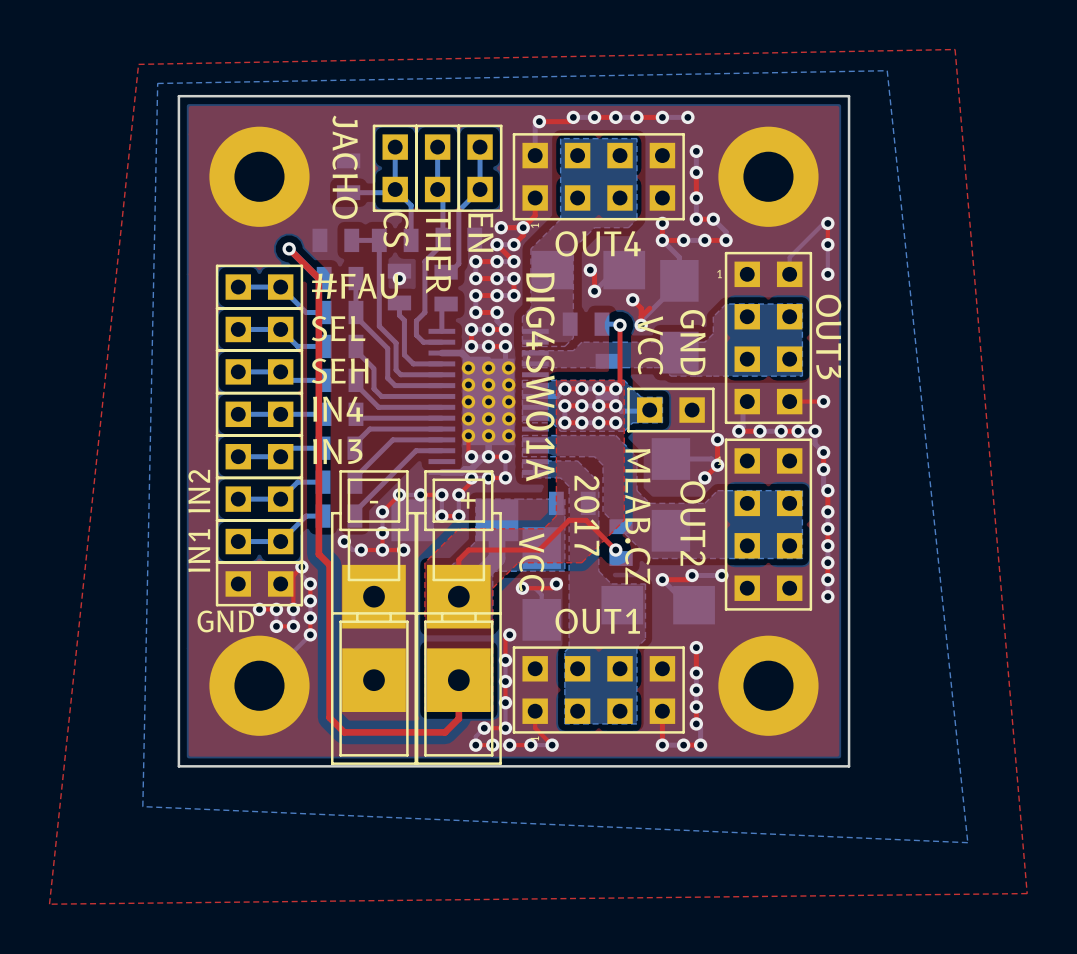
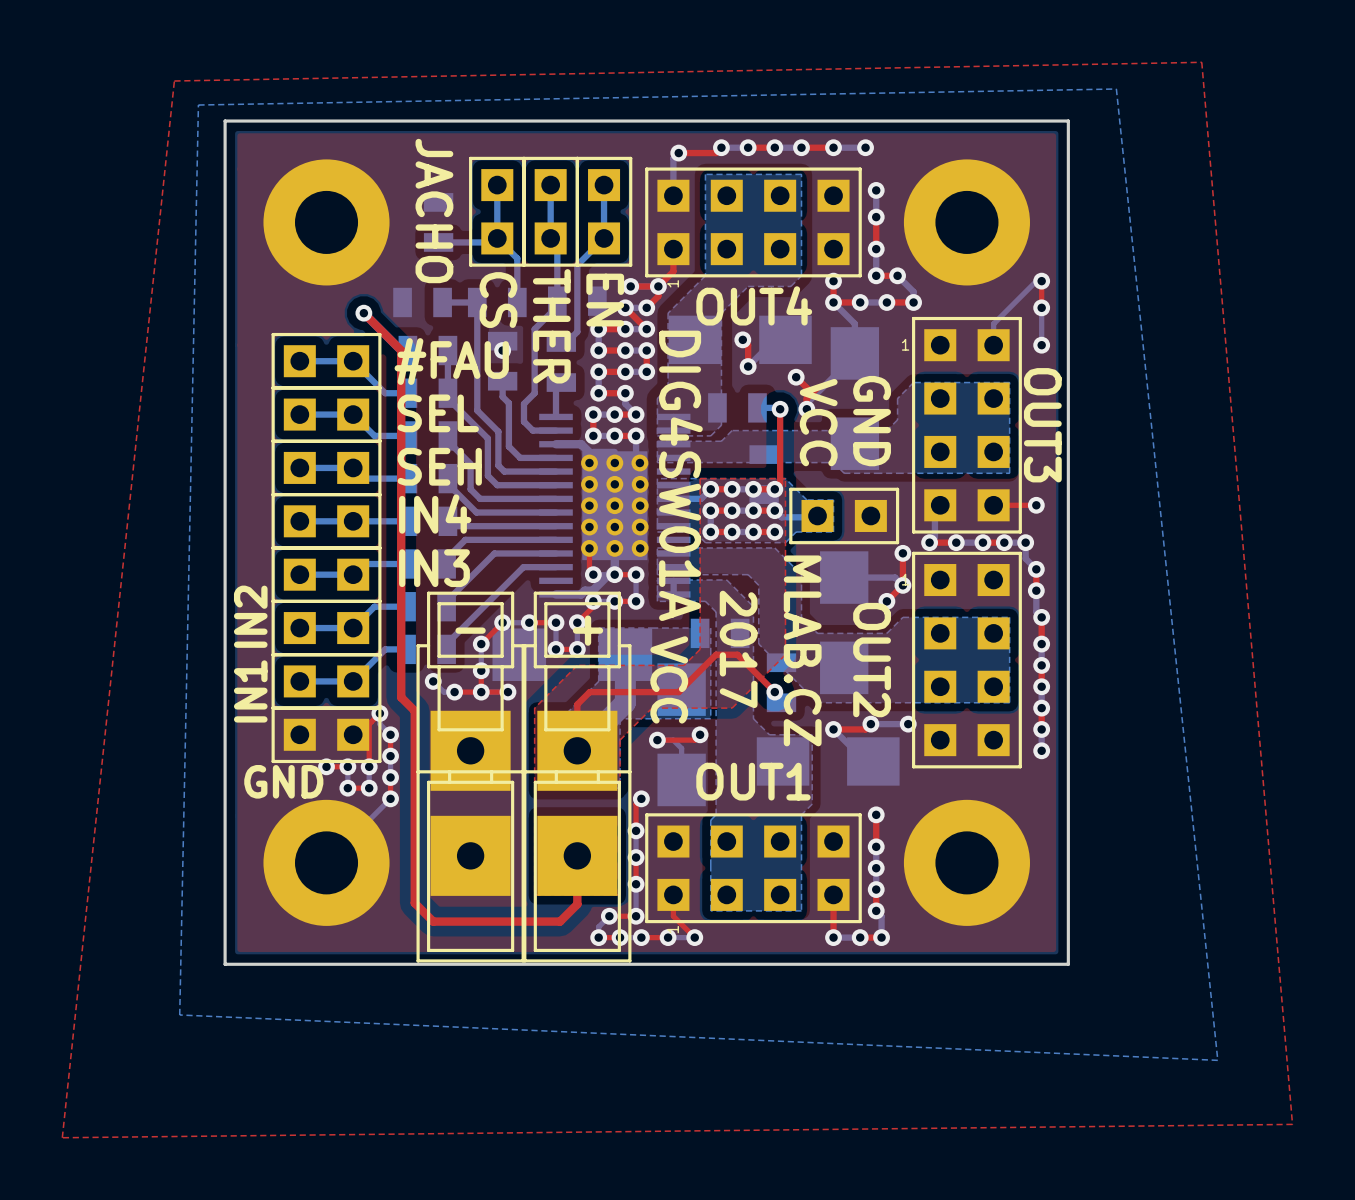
text position: VCC (531, 562) -> VCC (669, 679)

